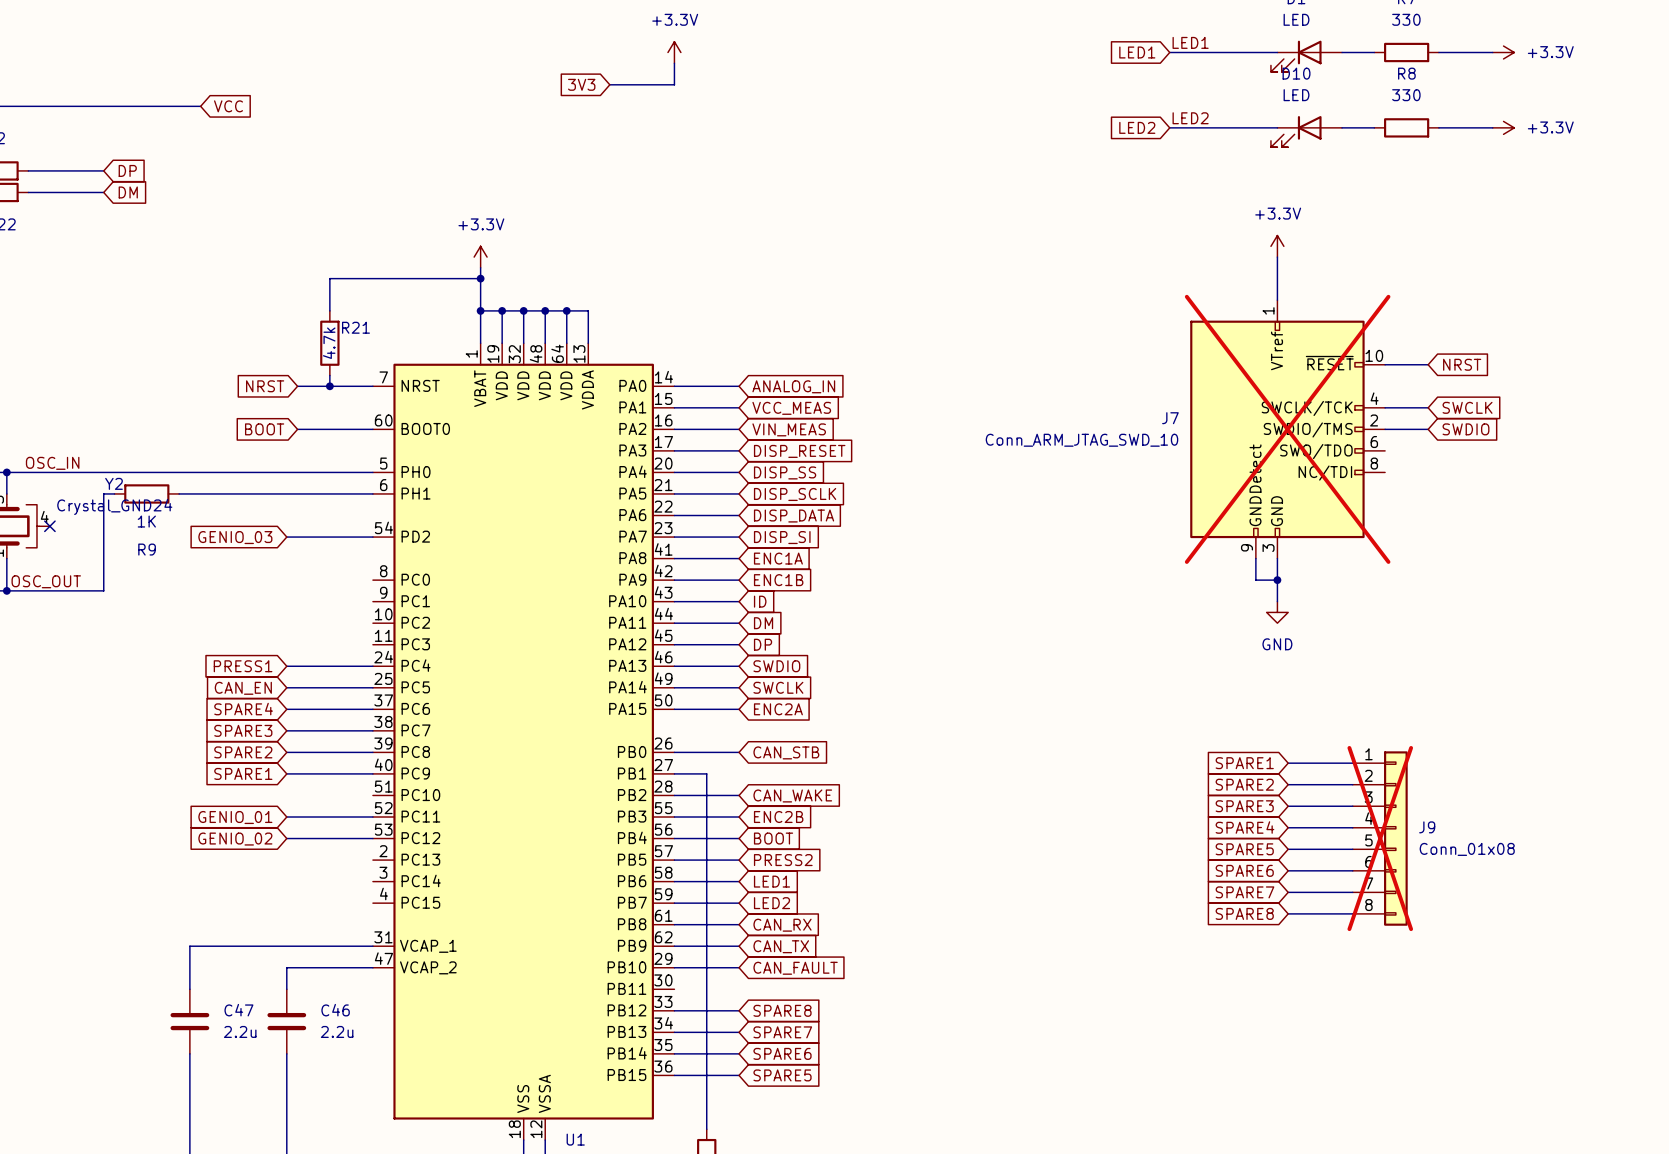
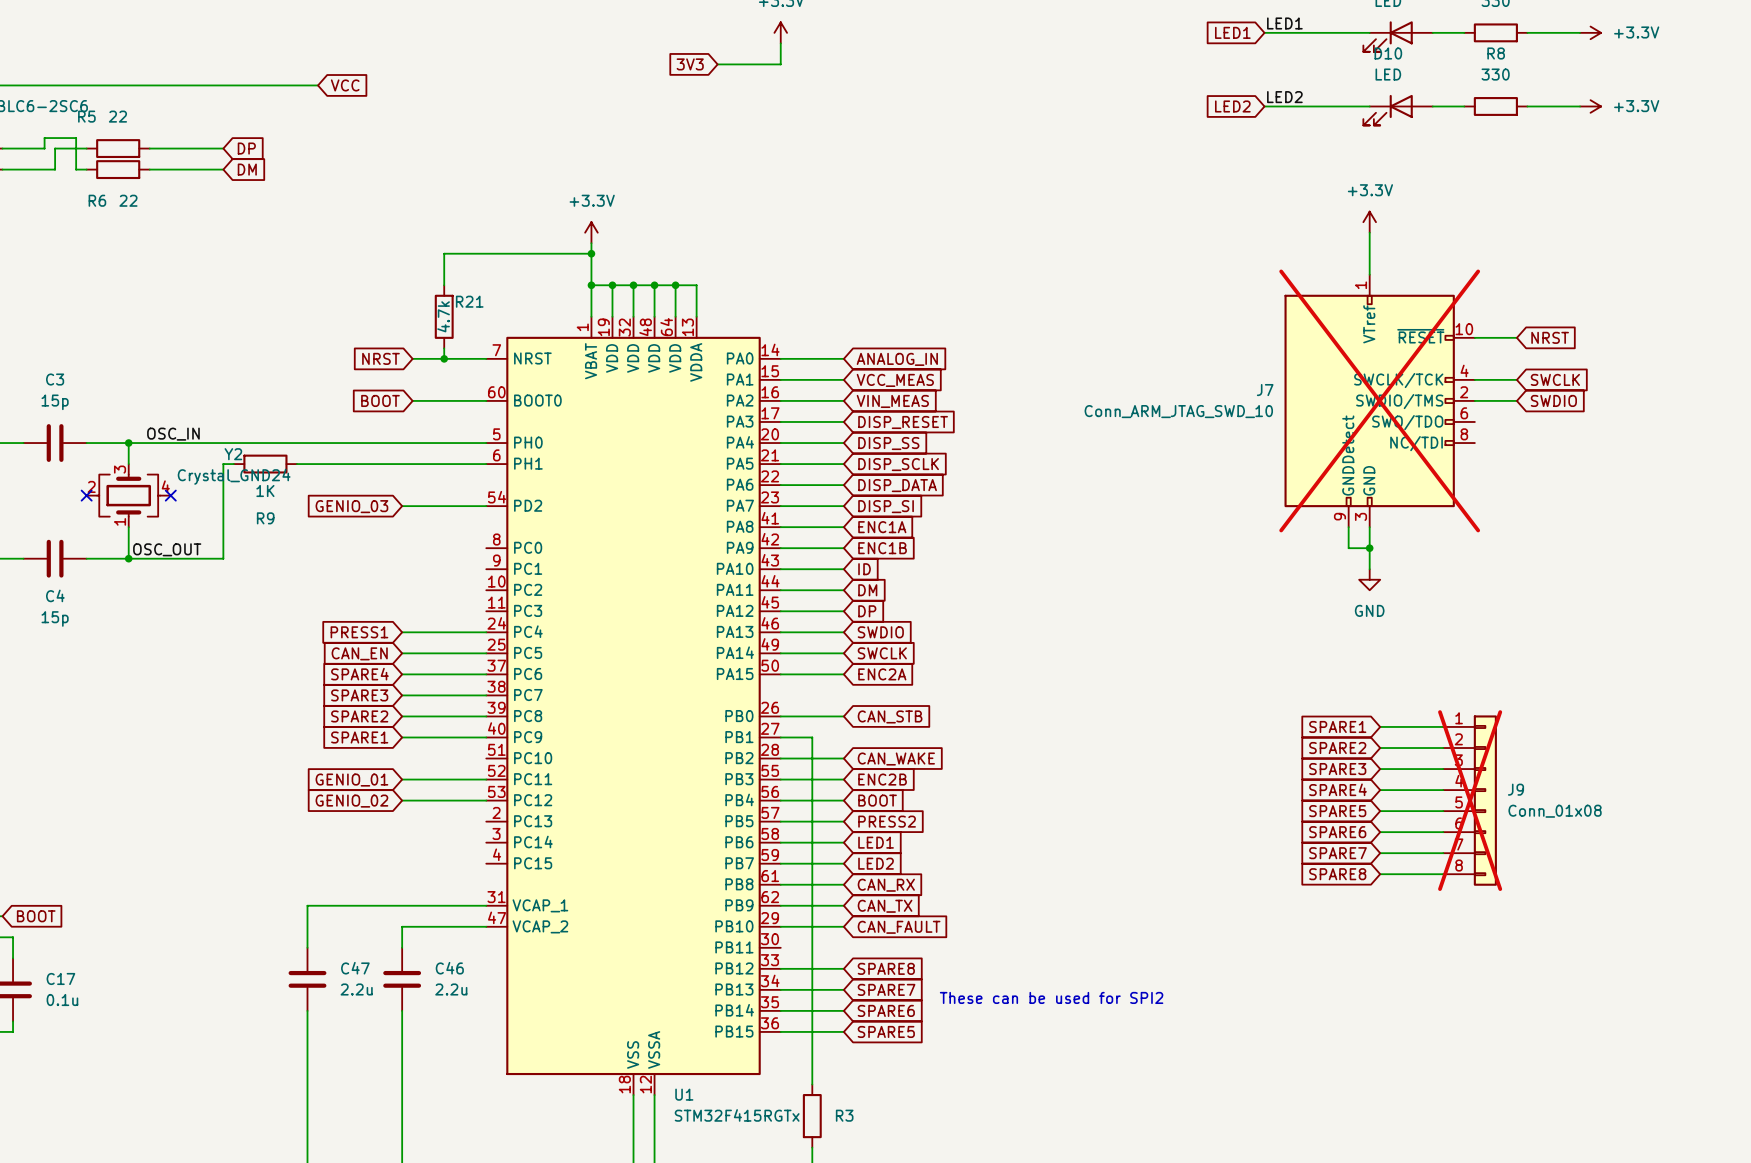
text: none -> These can be used for SPI2 (1051, 997)

